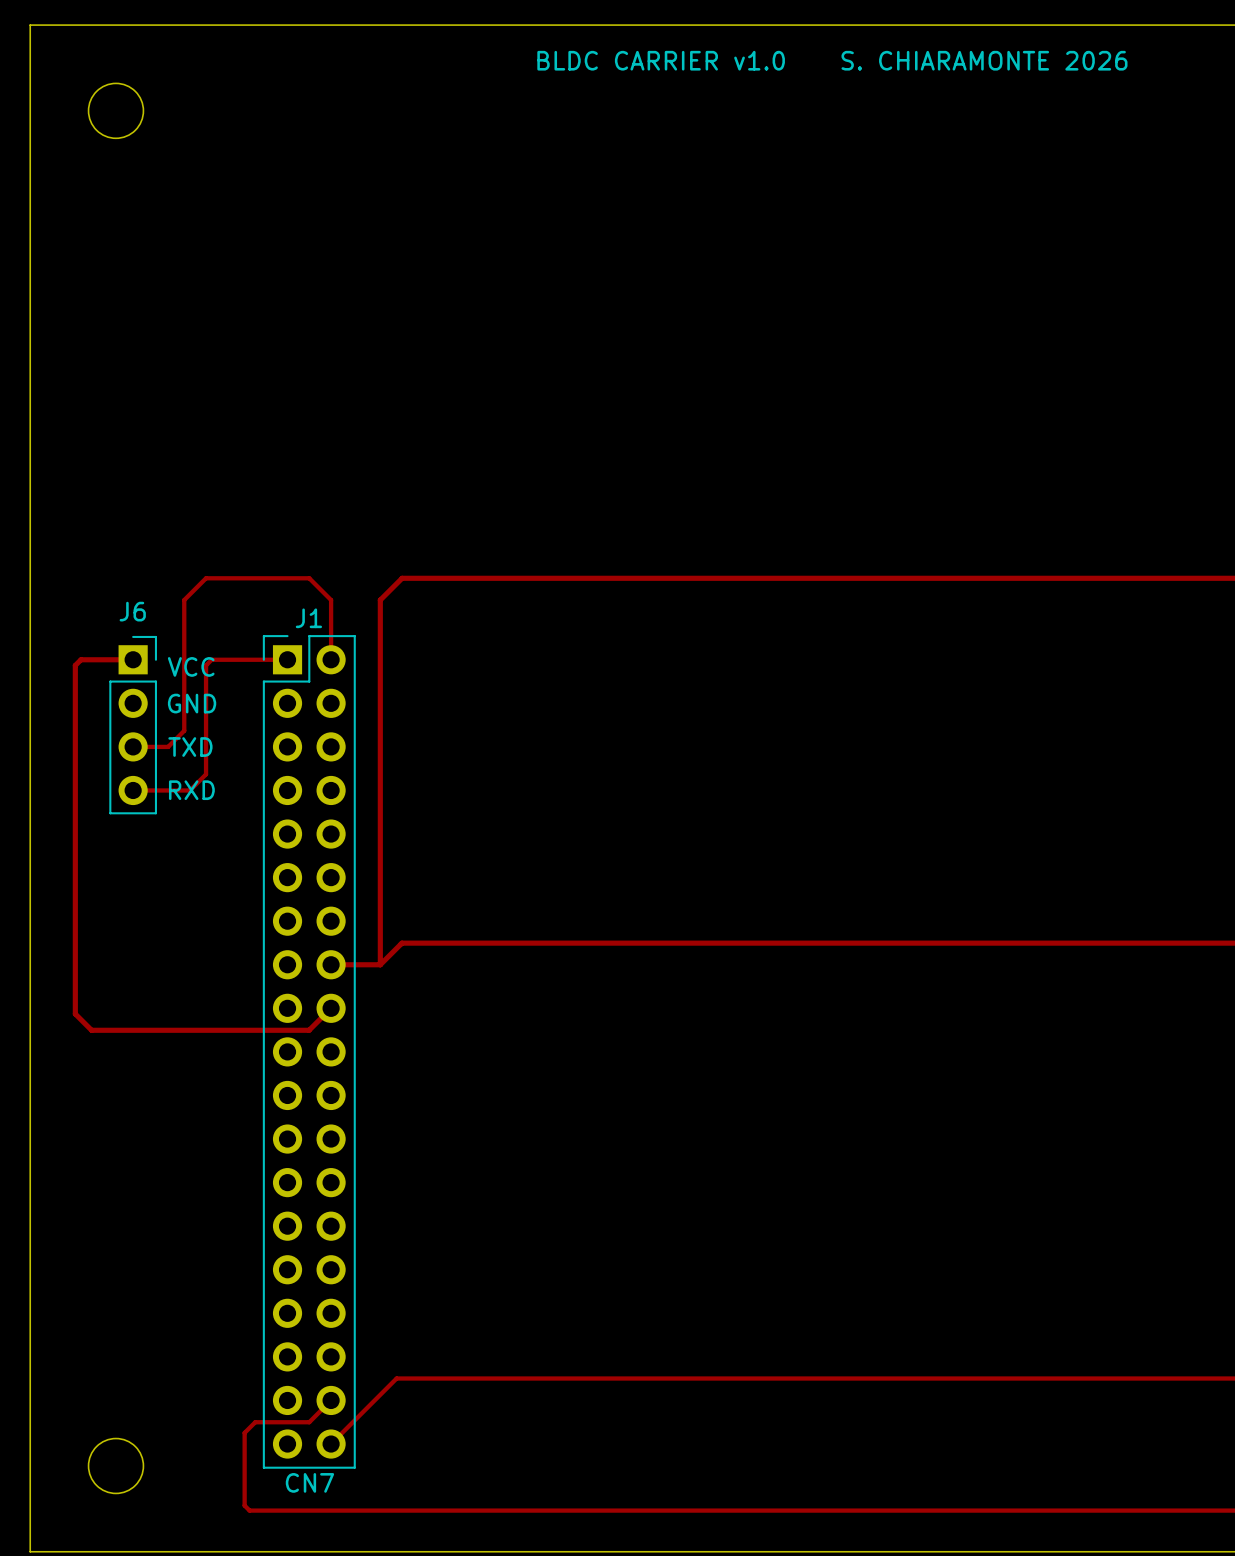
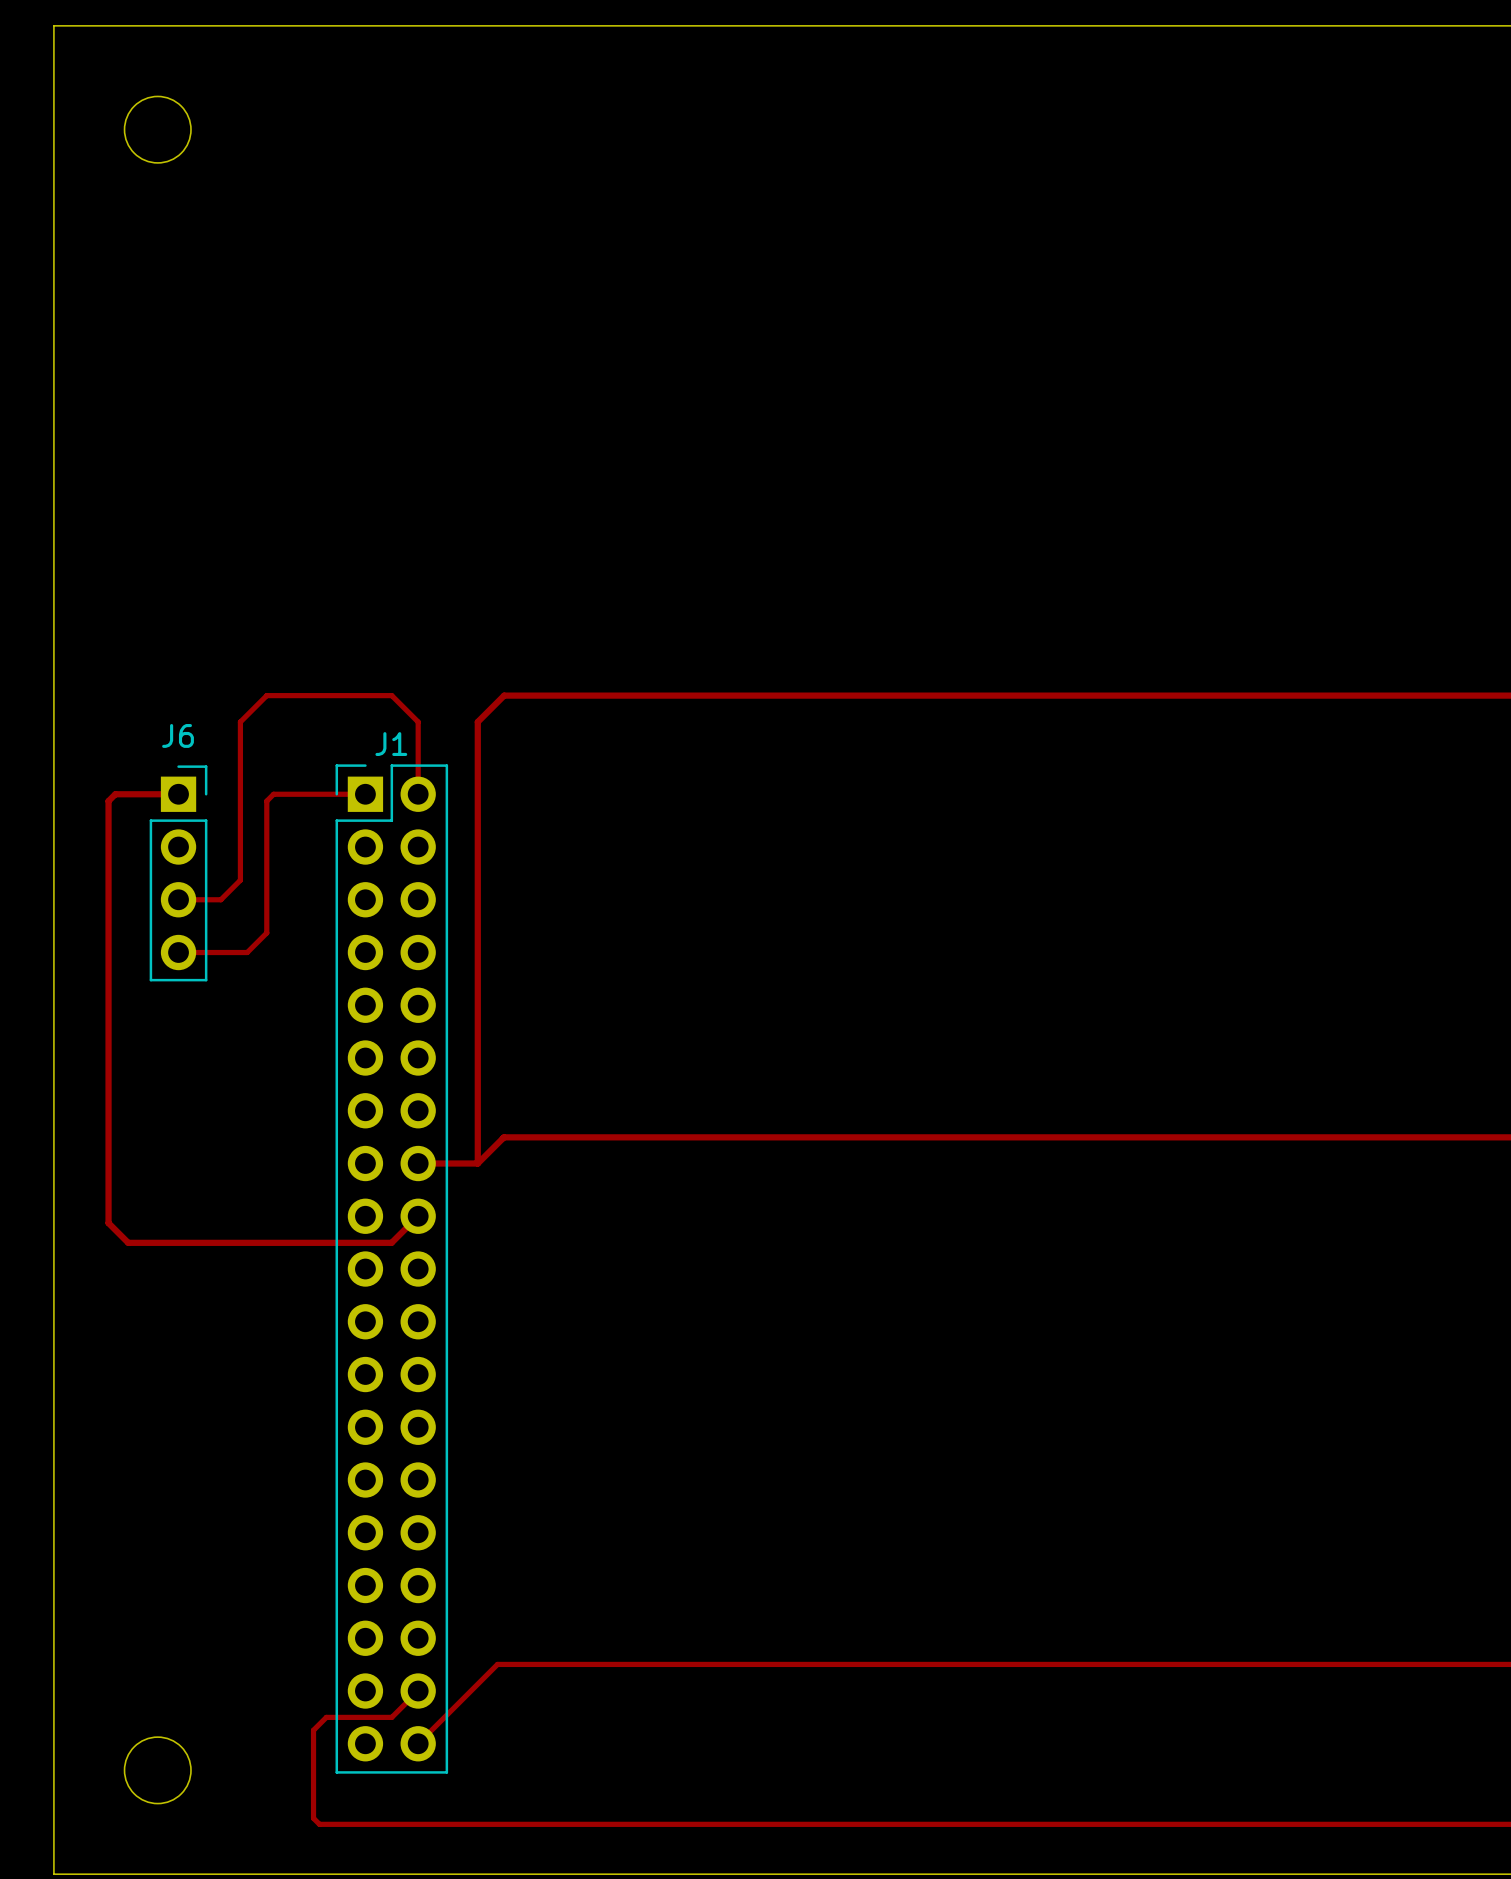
text: BLDC CARRIER v1.0 (661, 60) -> none
text: S. CHIARAMONTE 2026 (984, 60) -> none
text: VCC (191, 666) -> none
text: GND (192, 703) -> none
text: TXD (190, 747) -> none
text: RXD (191, 790) -> none
text: CN7 (309, 1482) -> none

